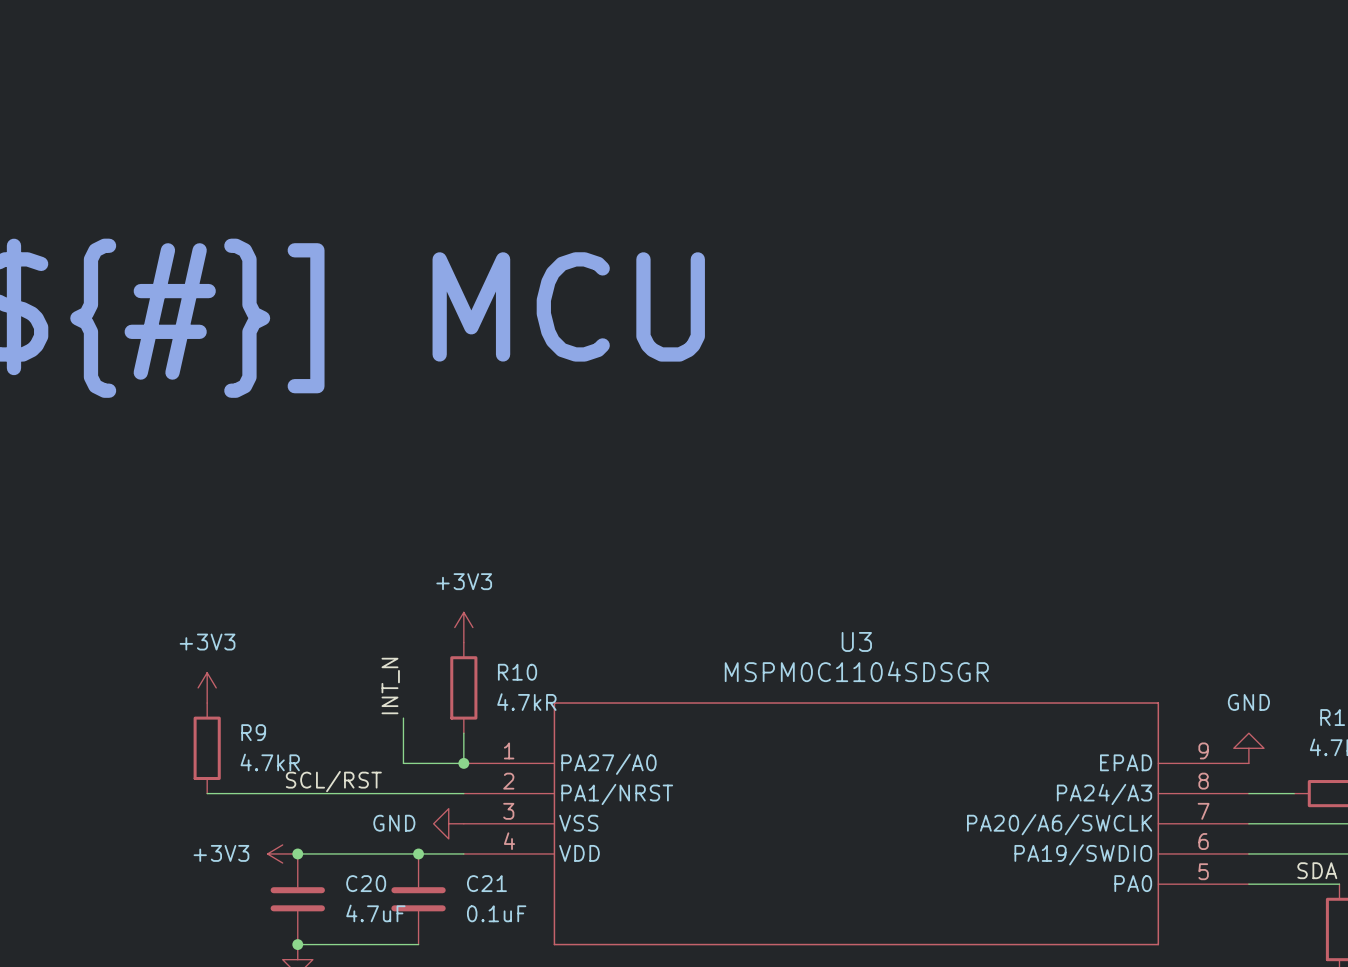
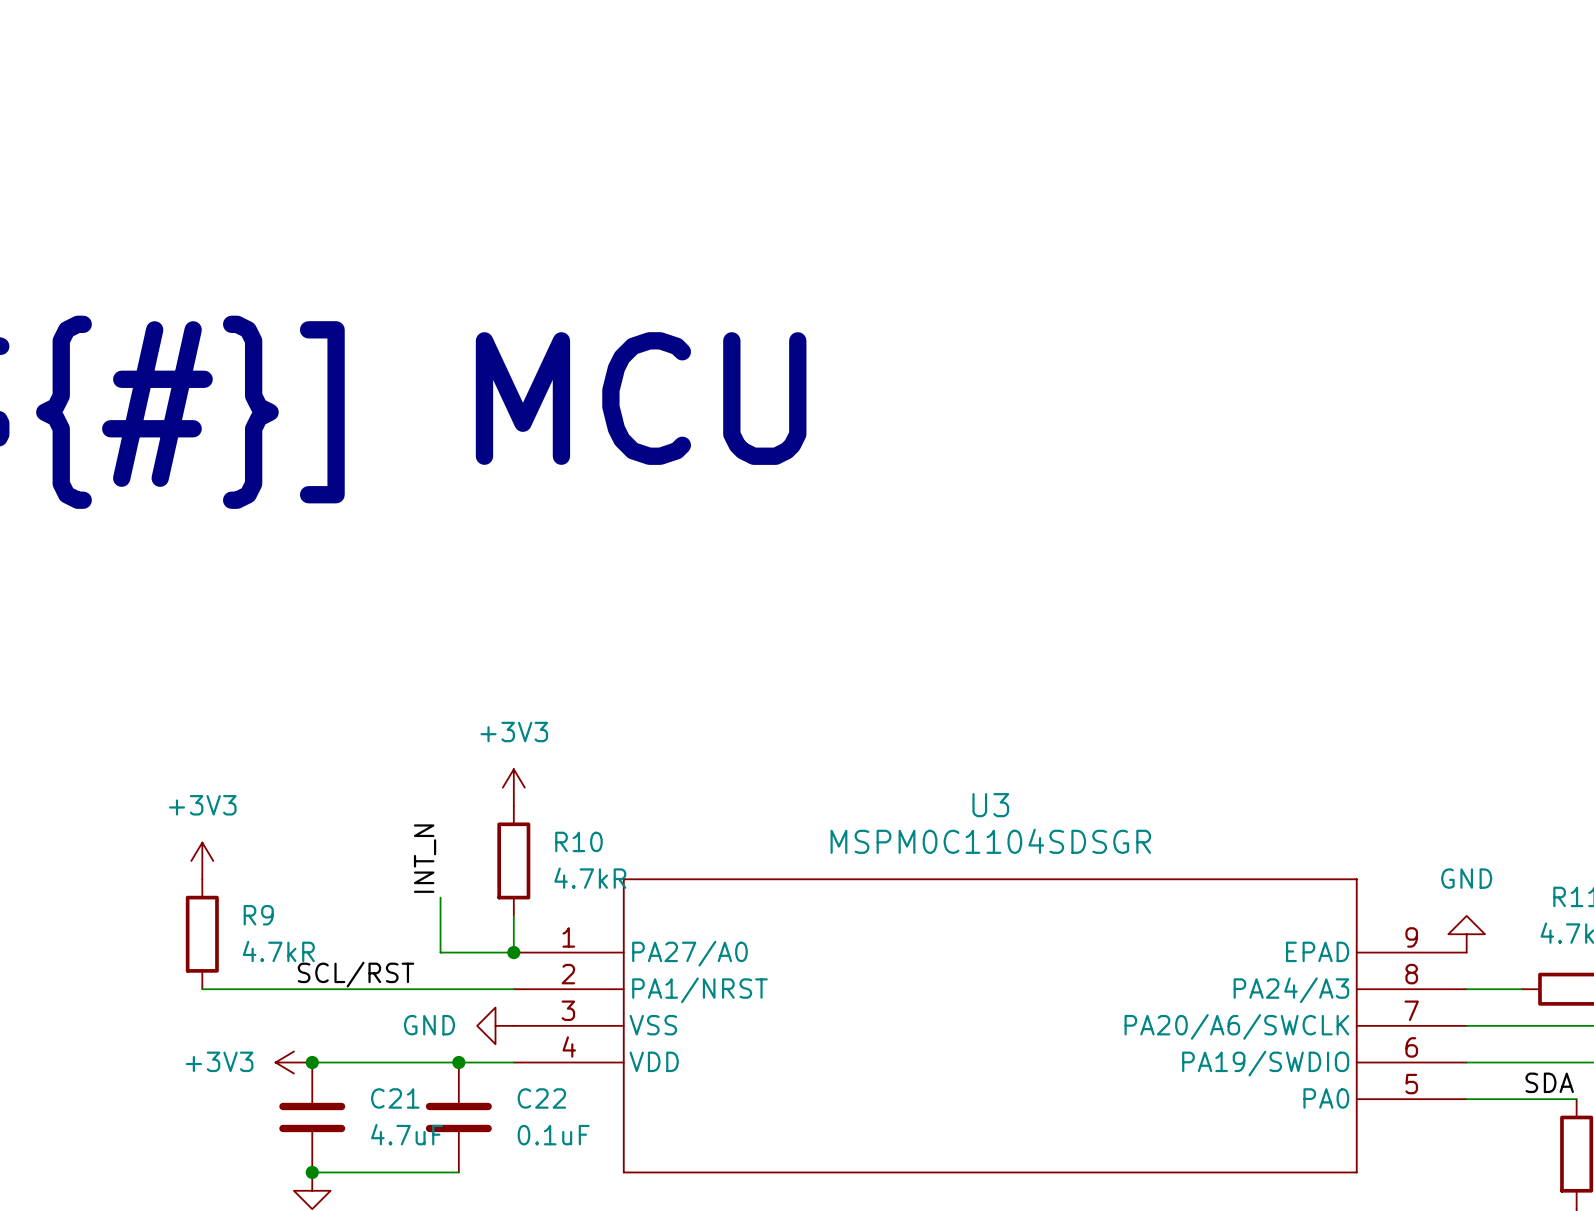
C20 name: C20 (366, 883) -> C21 (395, 1098)
C21 name: C21 (486, 883) -> C22 (541, 1098)

